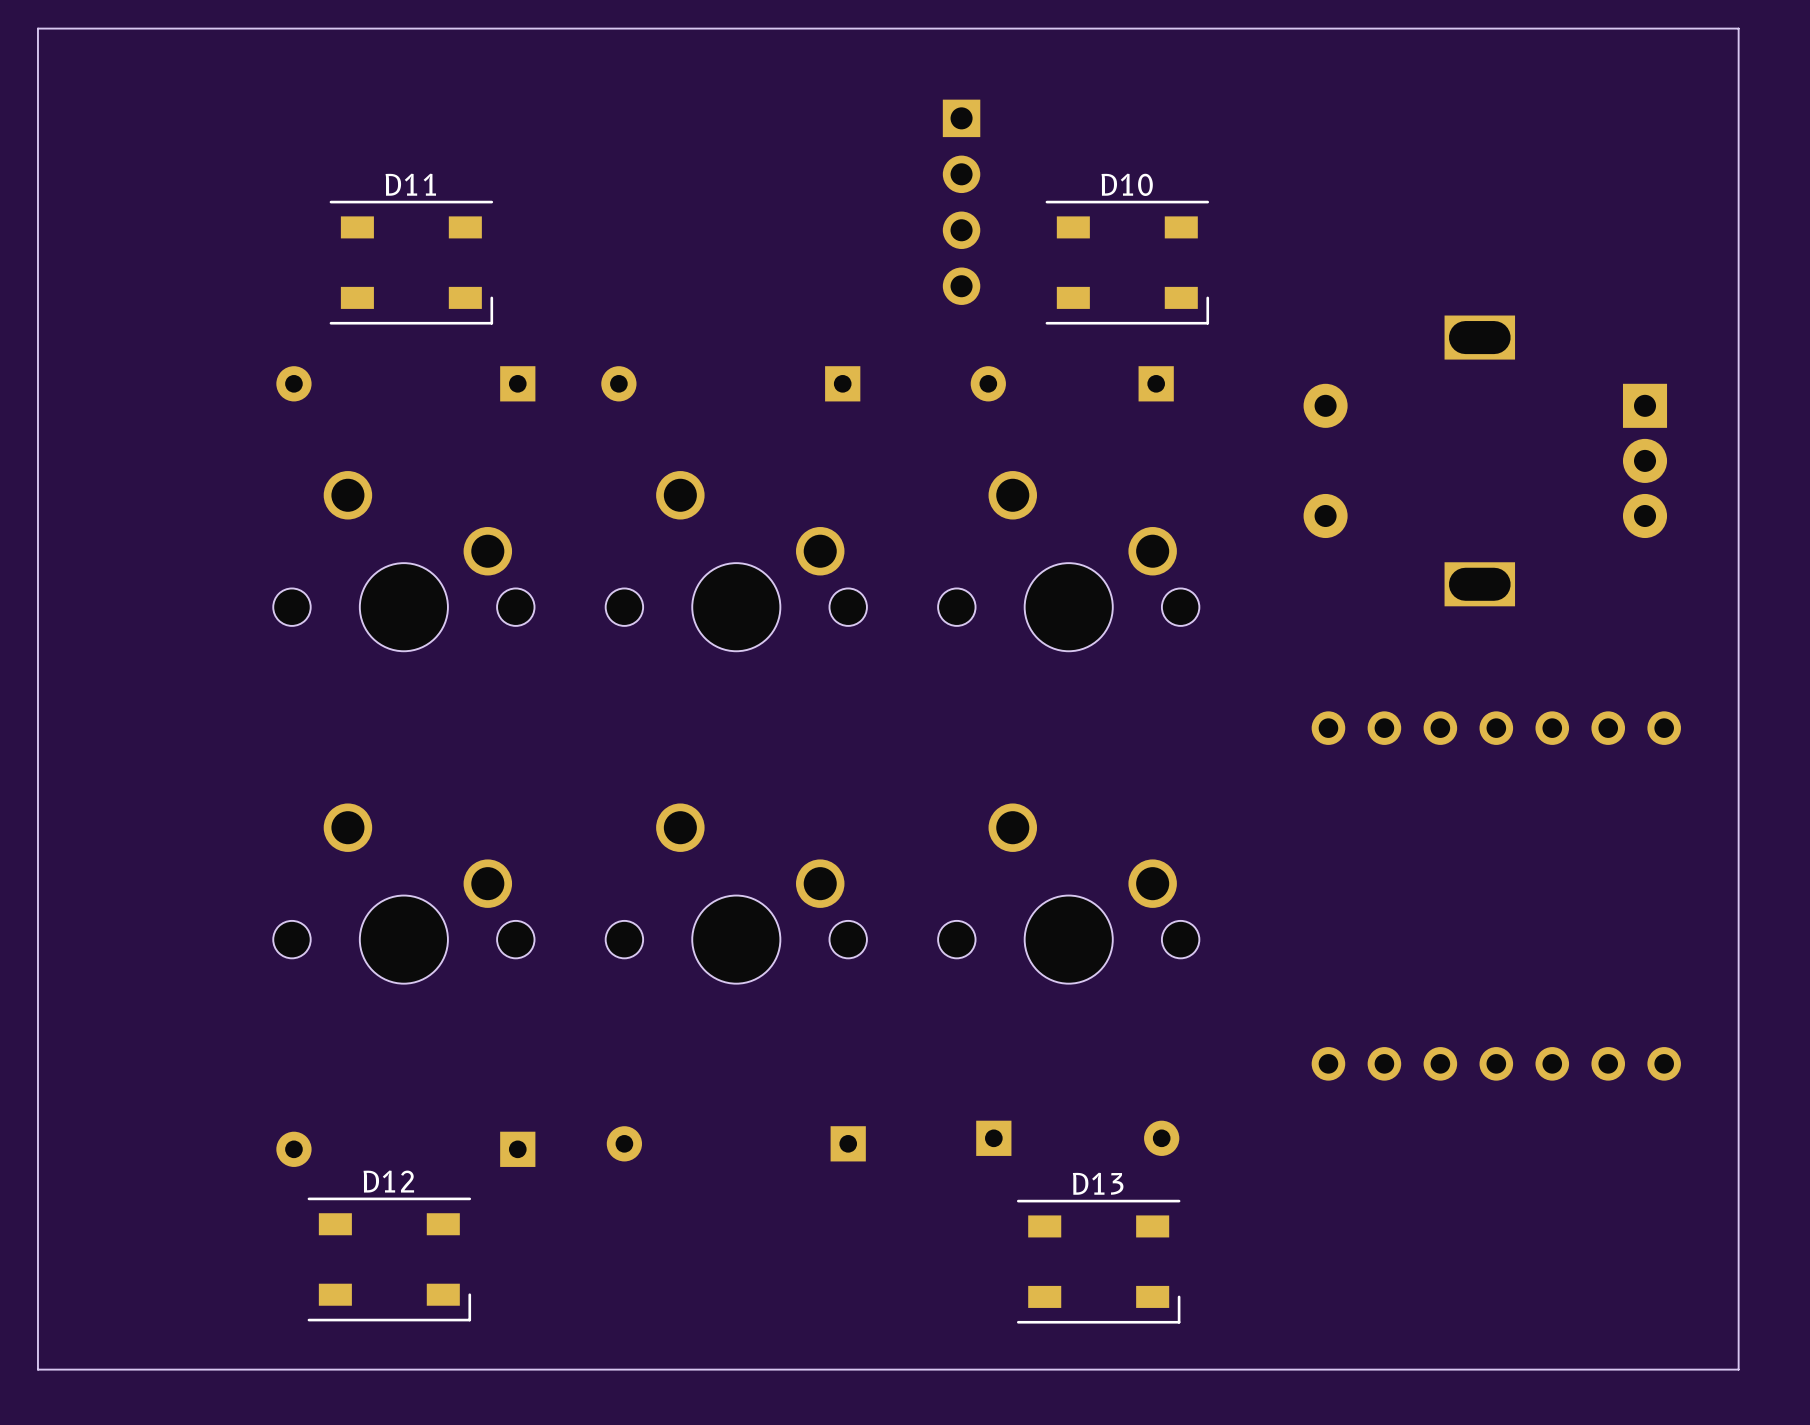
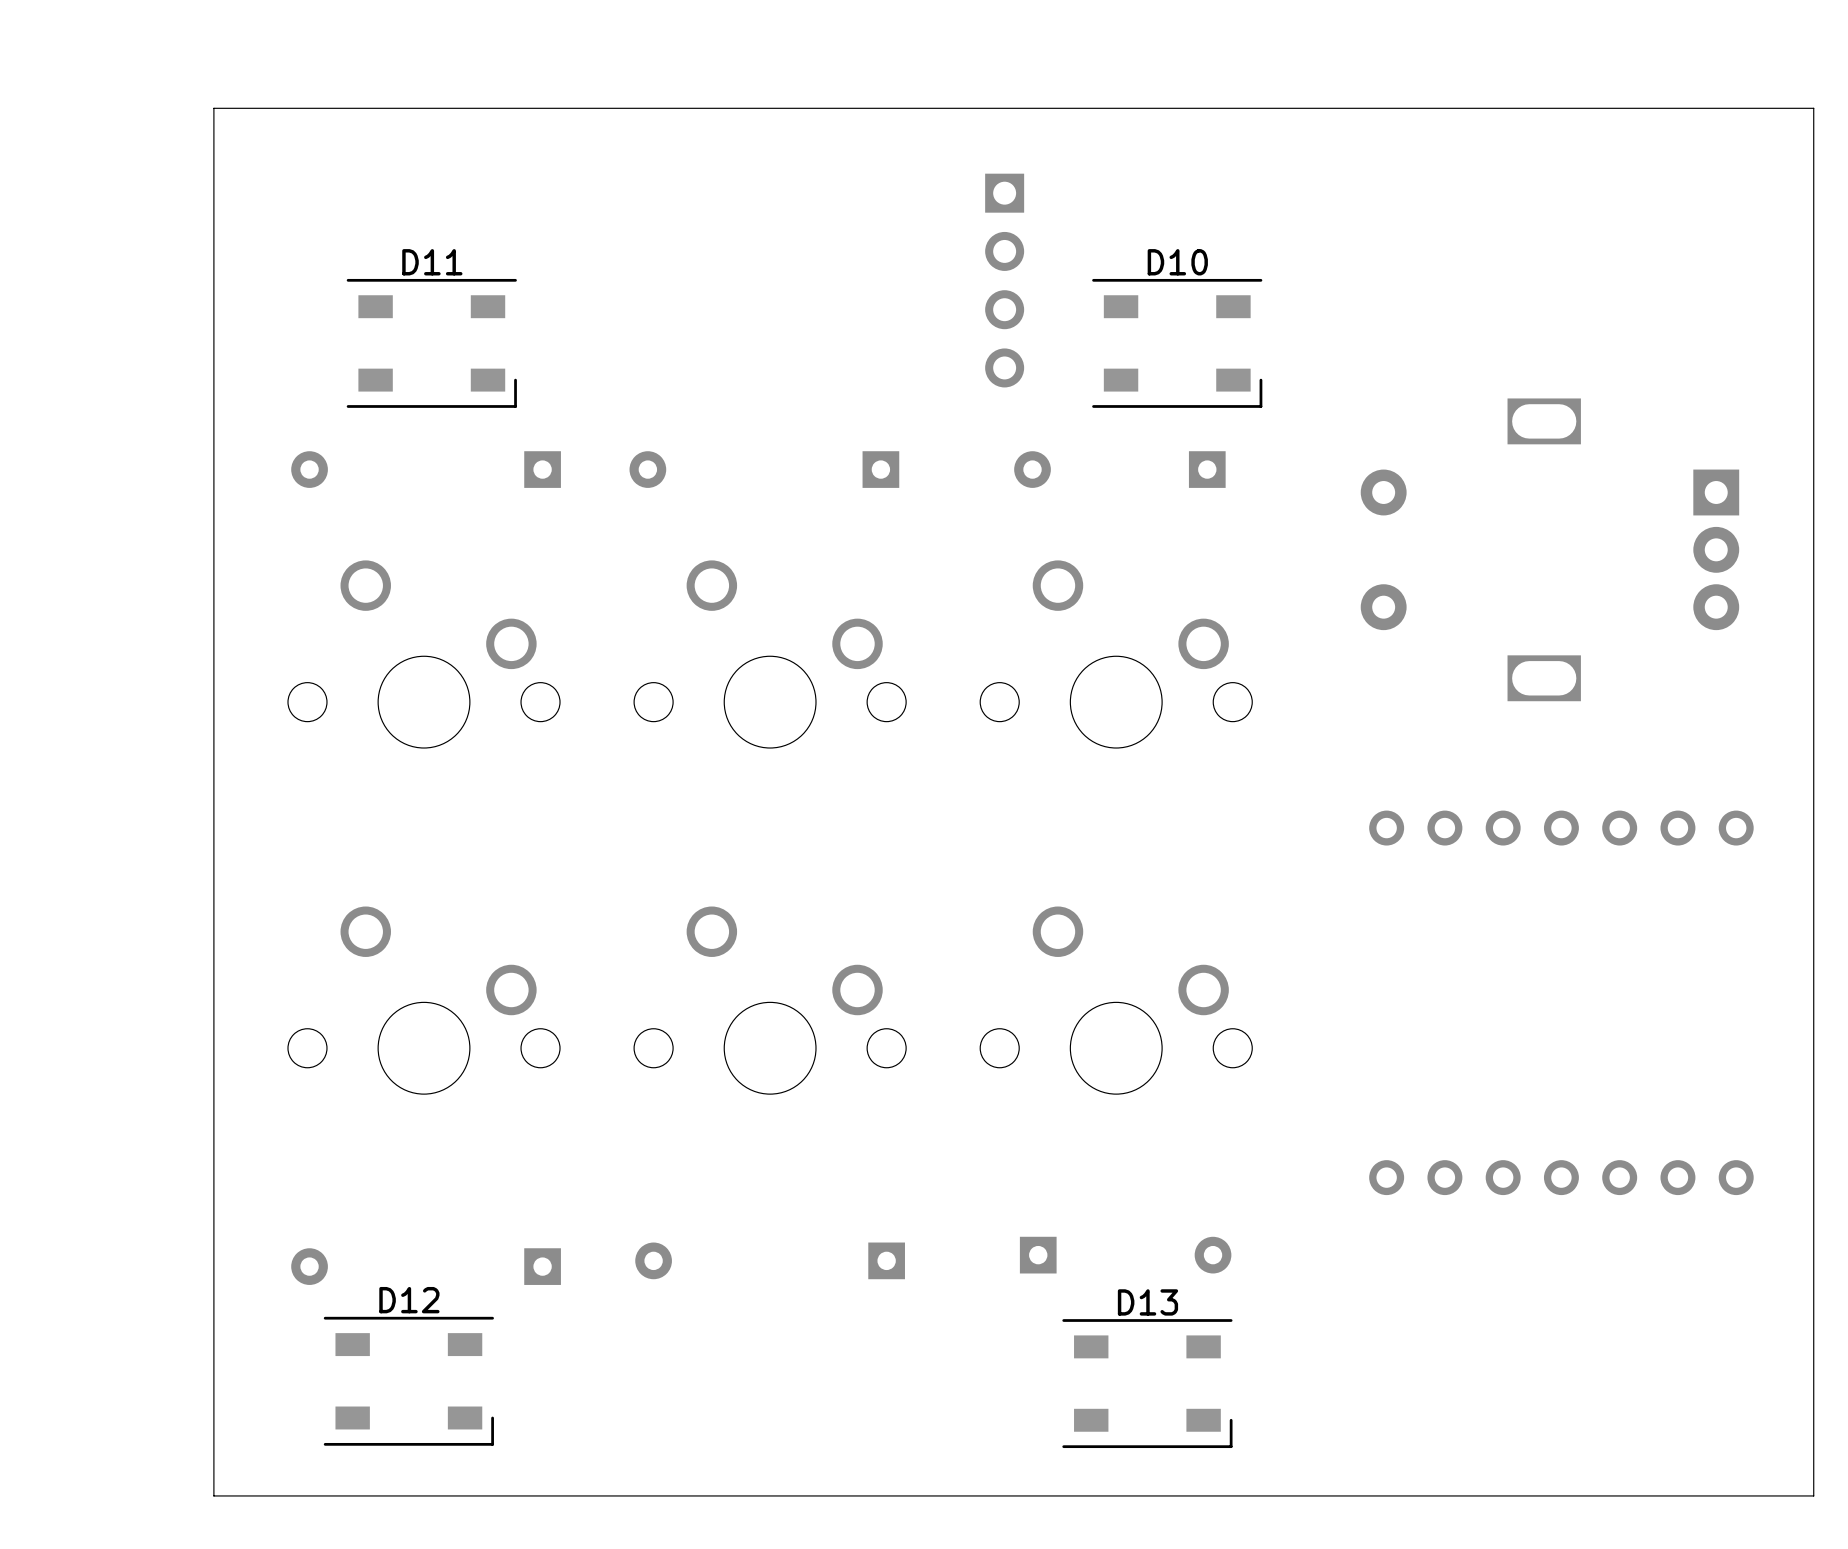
board edge: (1738, 36) (1738, 28) (37, 28) (37, 1369) (202, 1369) -> (1813, 108) (213, 108) (213, 1495)

